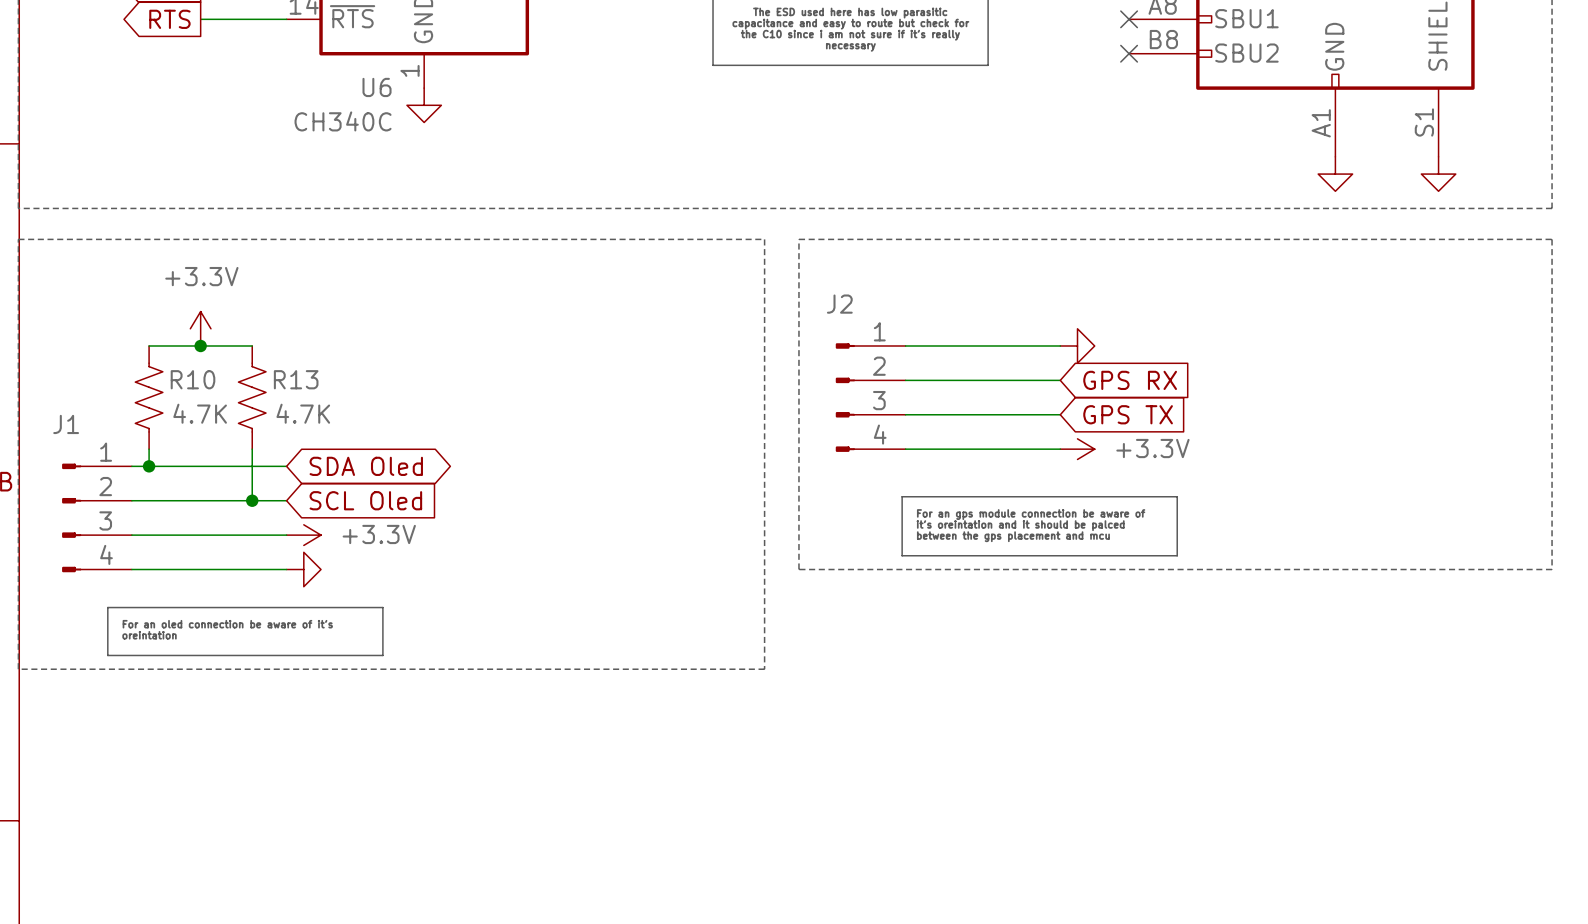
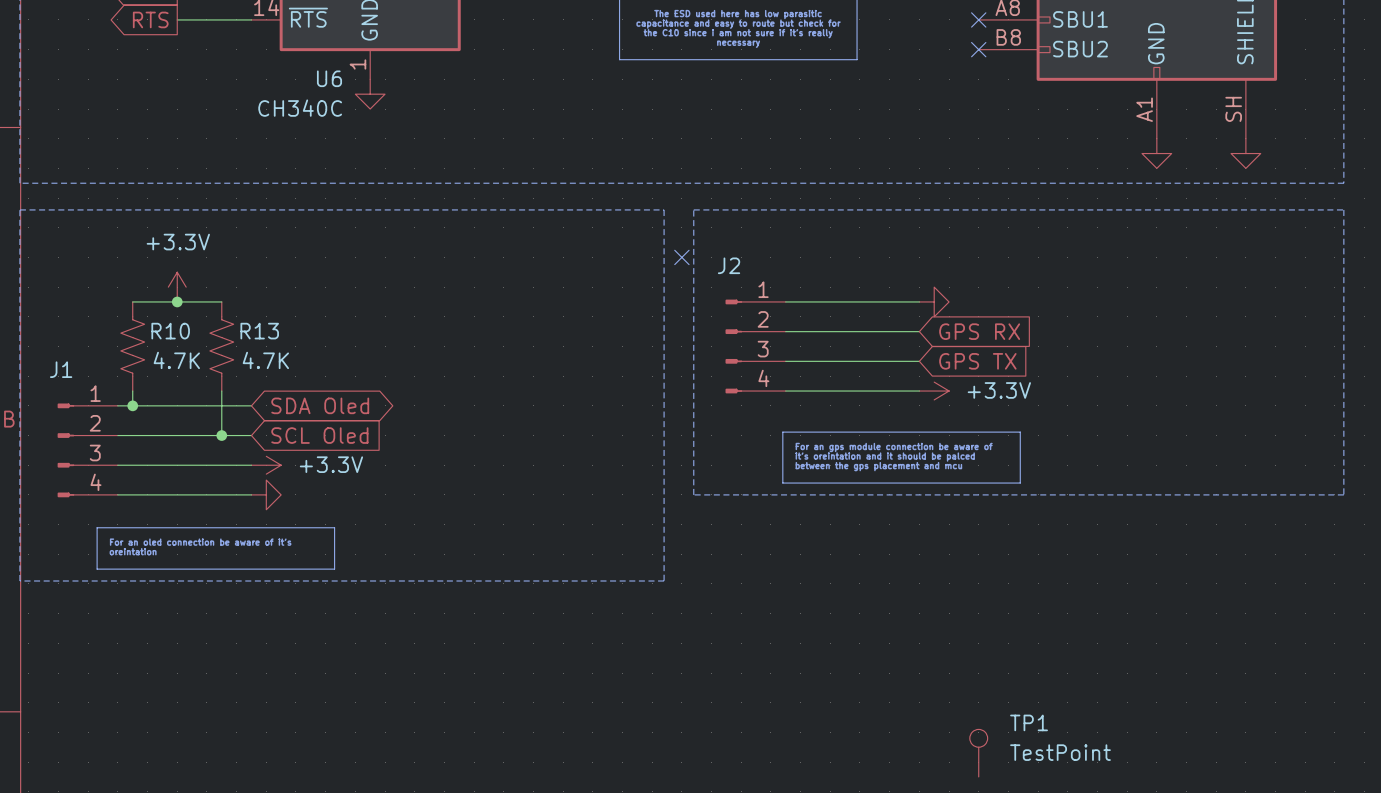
part pin number: S1 (1424, 122) -> SH (1233, 109)
no-connect mark: none -> (681, 257)
TP1: none -> TestPoint (978, 753)

